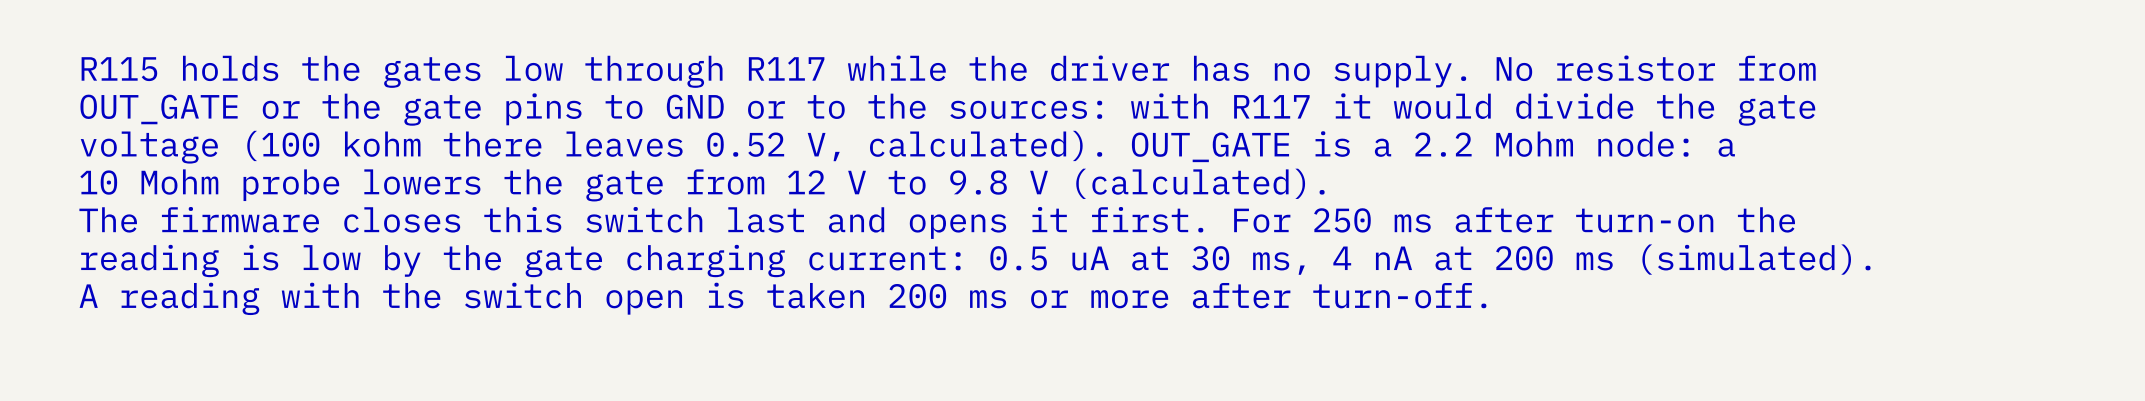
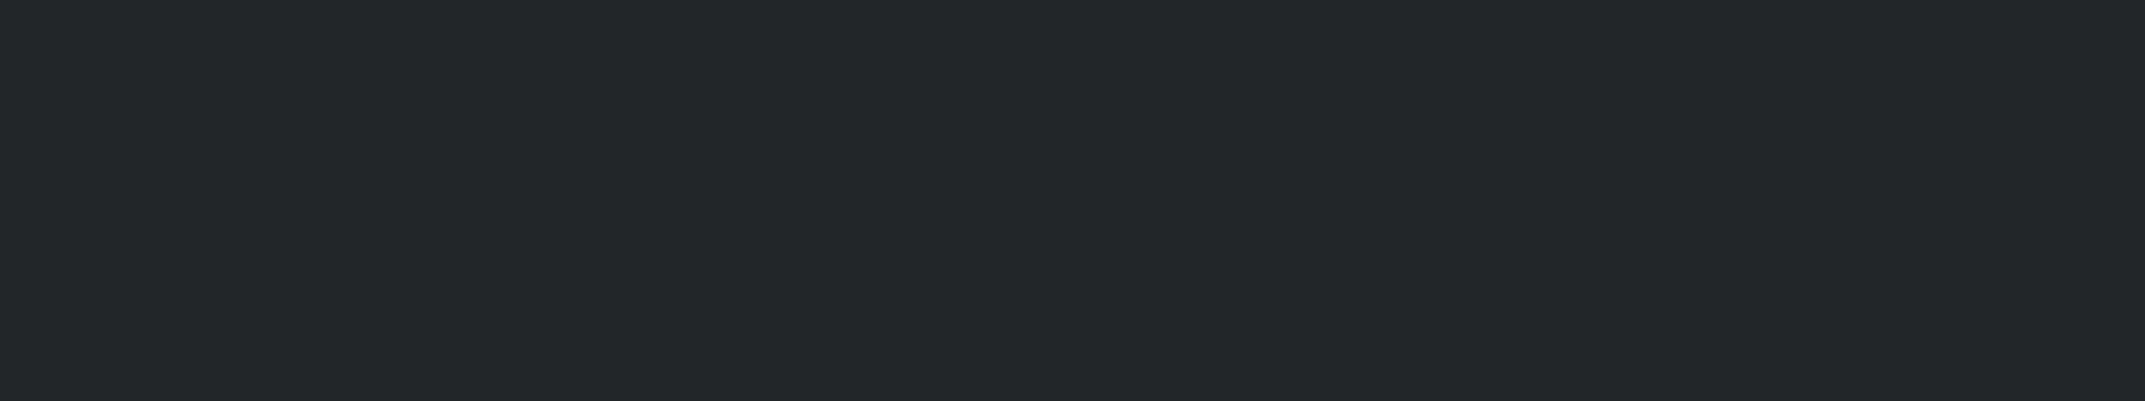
text: R115 holds the gates low through R117 while the driver has no supply. No resistor from (948, 71) -> none
text: OUT_GATE or the gate pins to GND or to the sources: with R117 it would divide the gate (947, 109) -> none
text: voltage (100 kohm there leaves 0.52 V, calculated). OUT_GATE is a 2.2 Mohm node: a (907, 147) -> none
text: 10 Mohm probe lowers the gate from 12 V to 9.8 V (calculated). (702, 185) -> none
text: The firmware closes this switch last and opens it first. For 250 ms after turn-on the (937, 222) -> none
text: reading is low by the gate charging current: 0.5 uA at 30 ms, 4 nA at 200 ms (simulated). (975, 260) -> none
text: A reading with the switch open is taken 200 ms or more after turn-off. (782, 298) -> none

